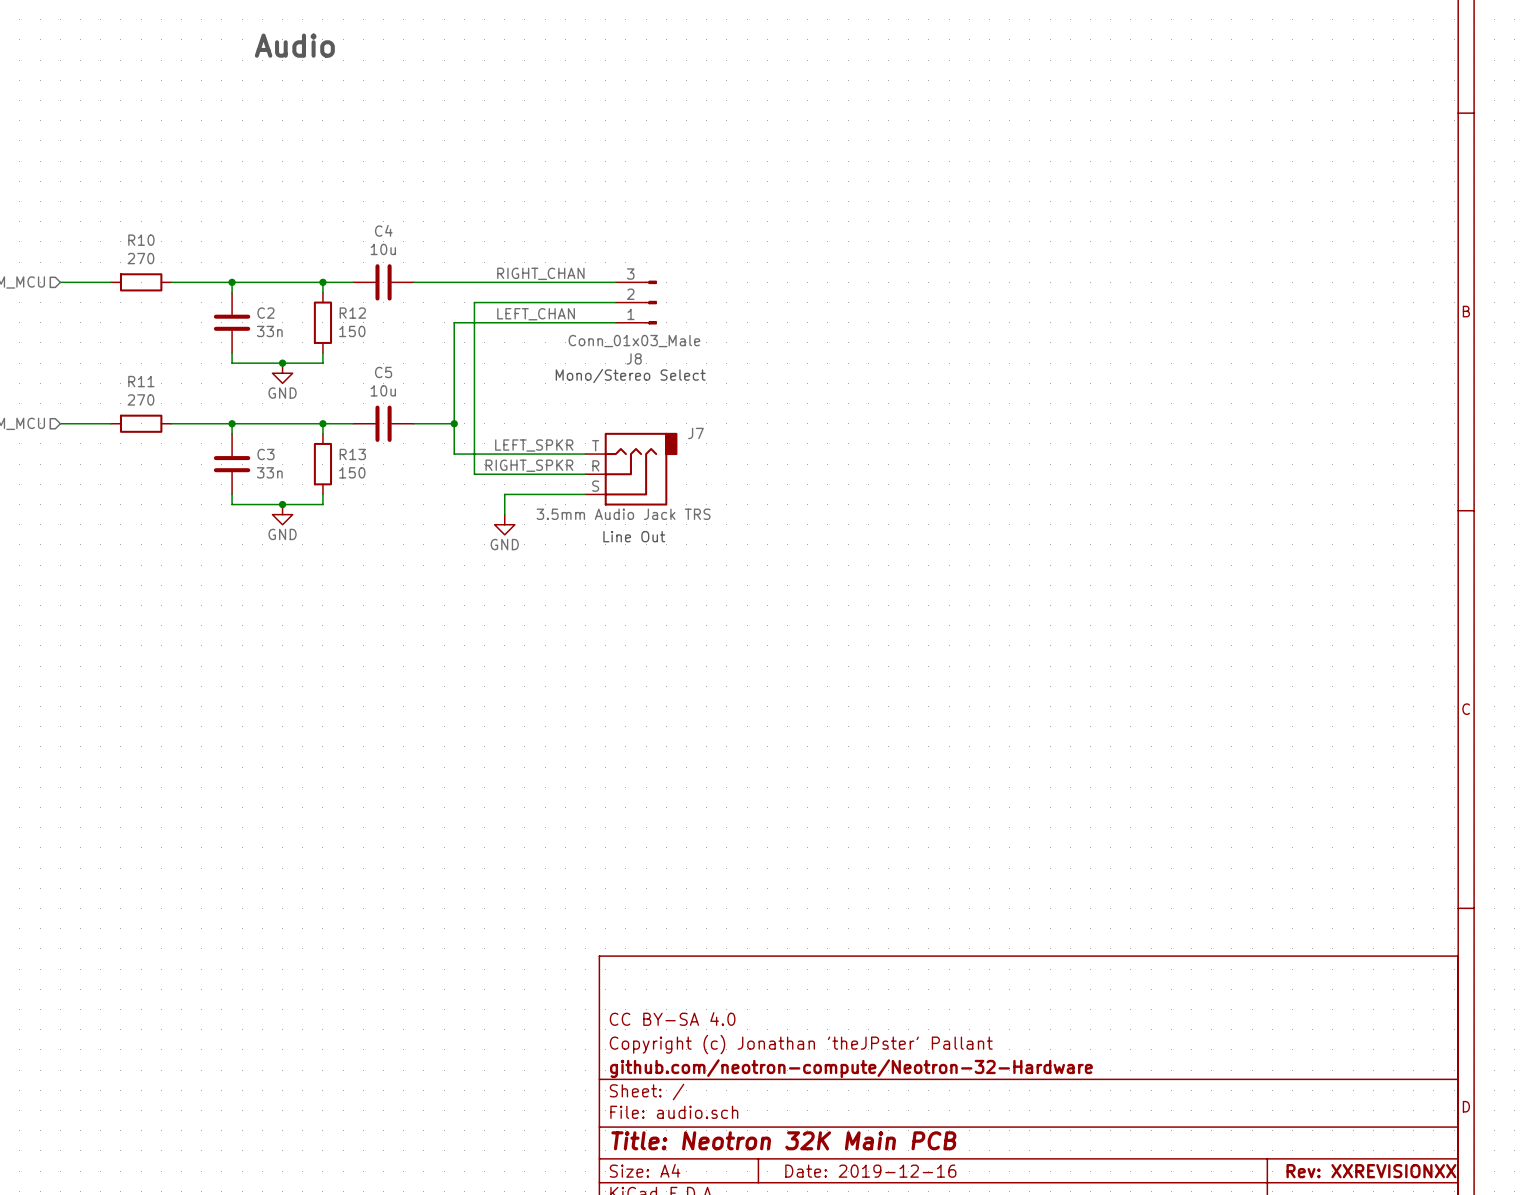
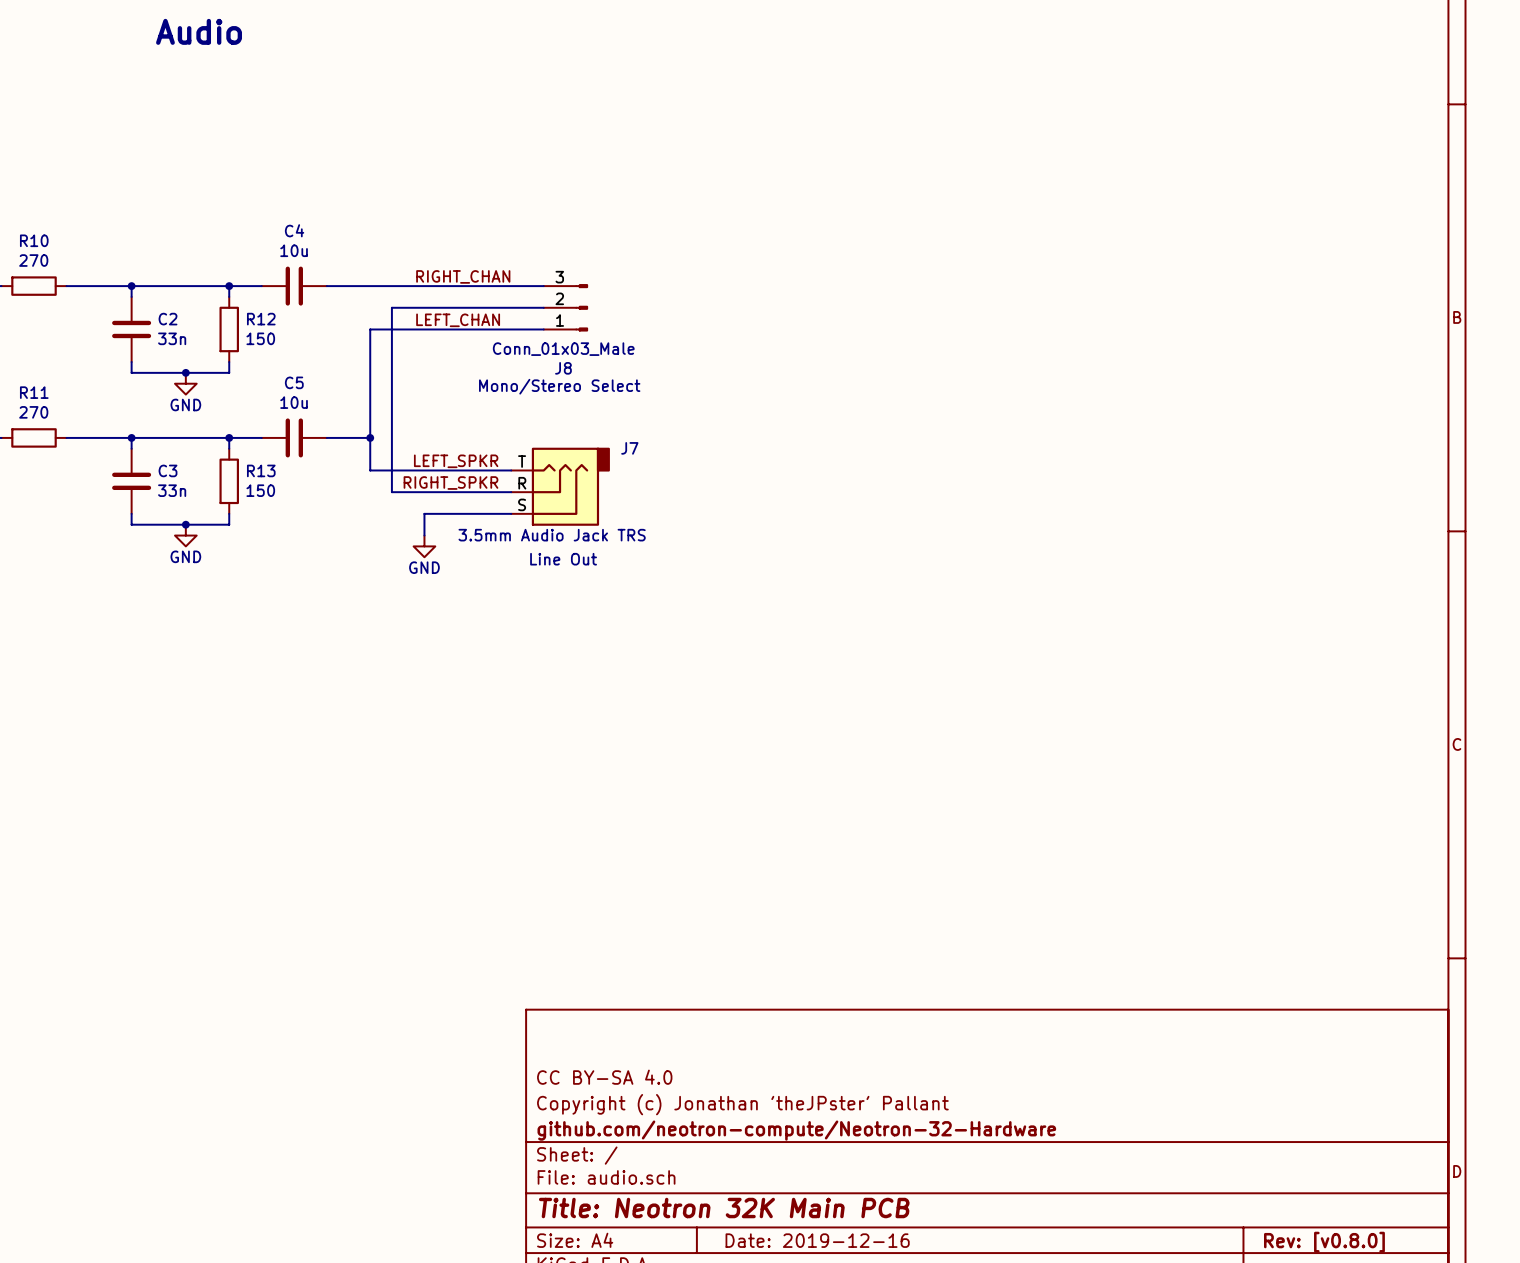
title block: Rev: XXREVISIONXX (1371, 1171) -> Rev: [v0.8.0] (1324, 1242)

